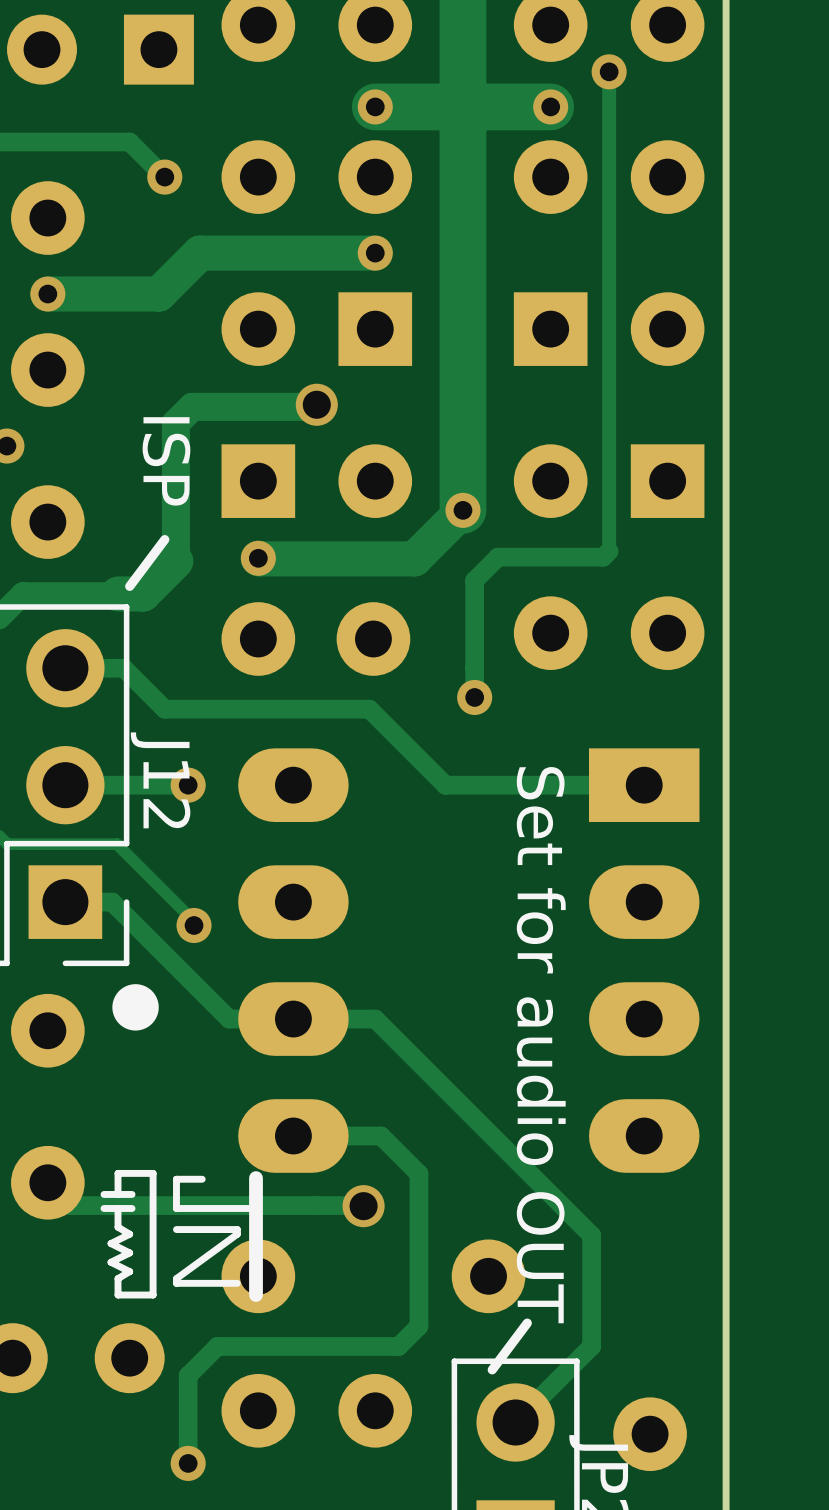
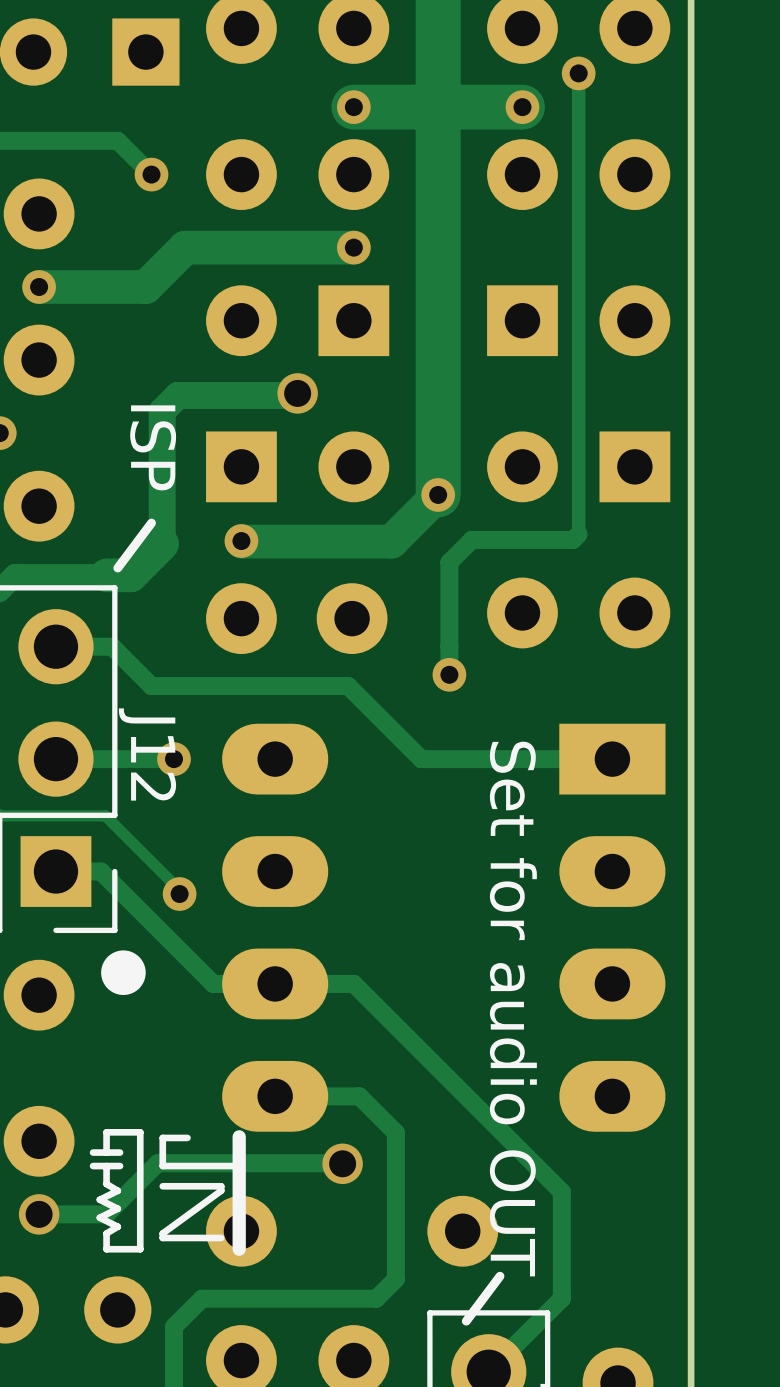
track: (47, 1182) (70, 1205) (171, 1205) -> (39, 1214) (106, 1214) (157, 1163)
via: none -> (39, 1214)

